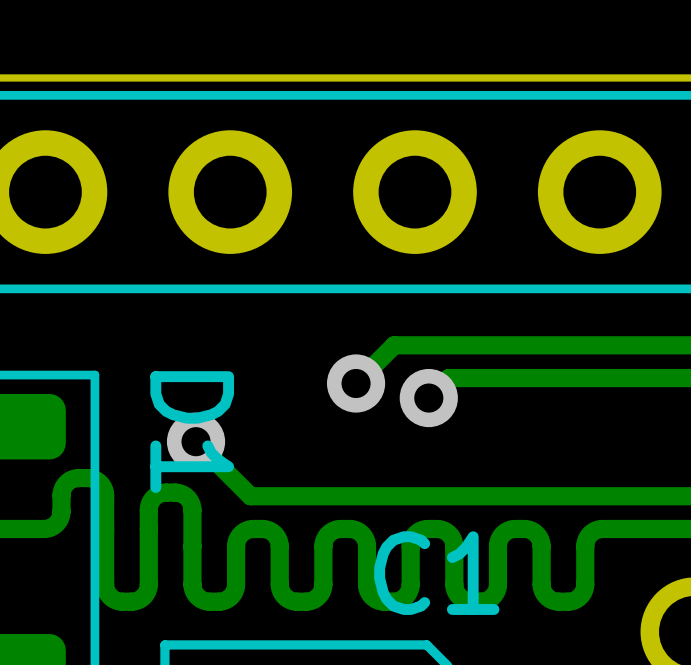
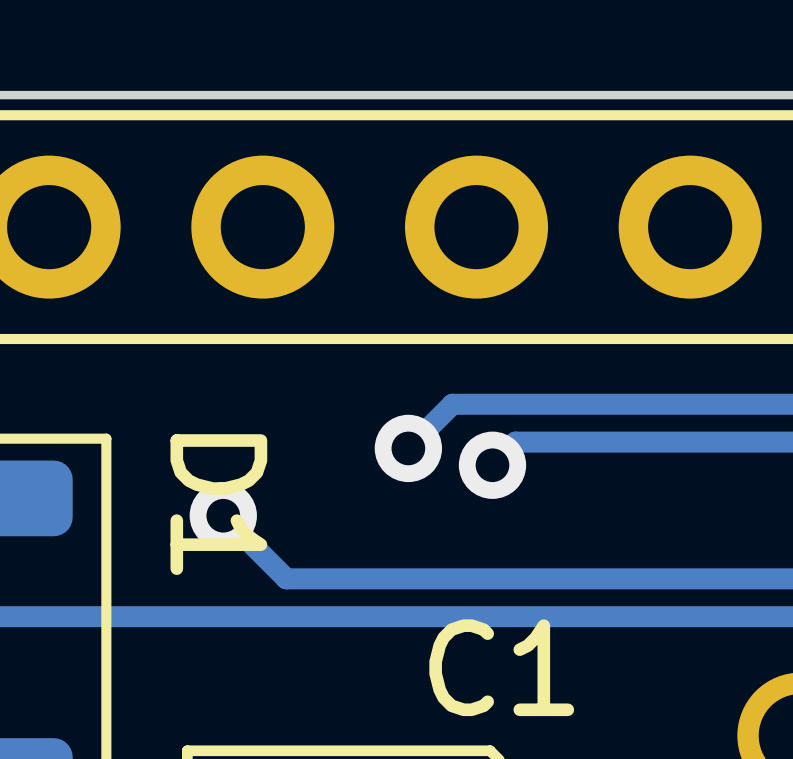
track: (253, 528) (244, 531) (237, 540) (234, 591) (227, 599) (218, 601) (202, 600) (193, 590) (192, 508) (188, 499) (182, 494) (162, 493) (155, 496) (150, 502) (148, 510) (148, 586) (144, 595) (135, 601) (116, 600) (110, 596) (106, 590) (105, 493) (98, 481) (87, 478) (75, 478) (68, 481) (61, 491) (59, 519) (53, 526) (44, 528) -> (289, 616) (47, 616)
track: (340, 528) (331, 531) (324, 540) (321, 591) (315, 599) (305, 601) (291, 600) (282, 593) (279, 586) (278, 540) (271, 531) (262, 528) -> (390, 616) (299, 616)
track: (428, 528) (418, 531) (412, 538) (409, 590) (404, 597) (393, 601) (378, 600) (369, 593) (367, 586) (366, 540) (358, 531) (349, 528) -> (491, 616) (400, 616)
track: (515, 528) (506, 531) (499, 538) (496, 590) (489, 599) (480, 601) (466, 600) (456, 593) (454, 586) (453, 540) (447, 532) (436, 528) -> (592, 616) (501, 616)
track: (602, 528) (593, 531) (586, 538) (584, 590) (578, 597) (567, 601) (553, 600) (544, 593) (541, 586) (540, 540) (533, 531) (524, 528) -> (693, 616) (602, 616)

